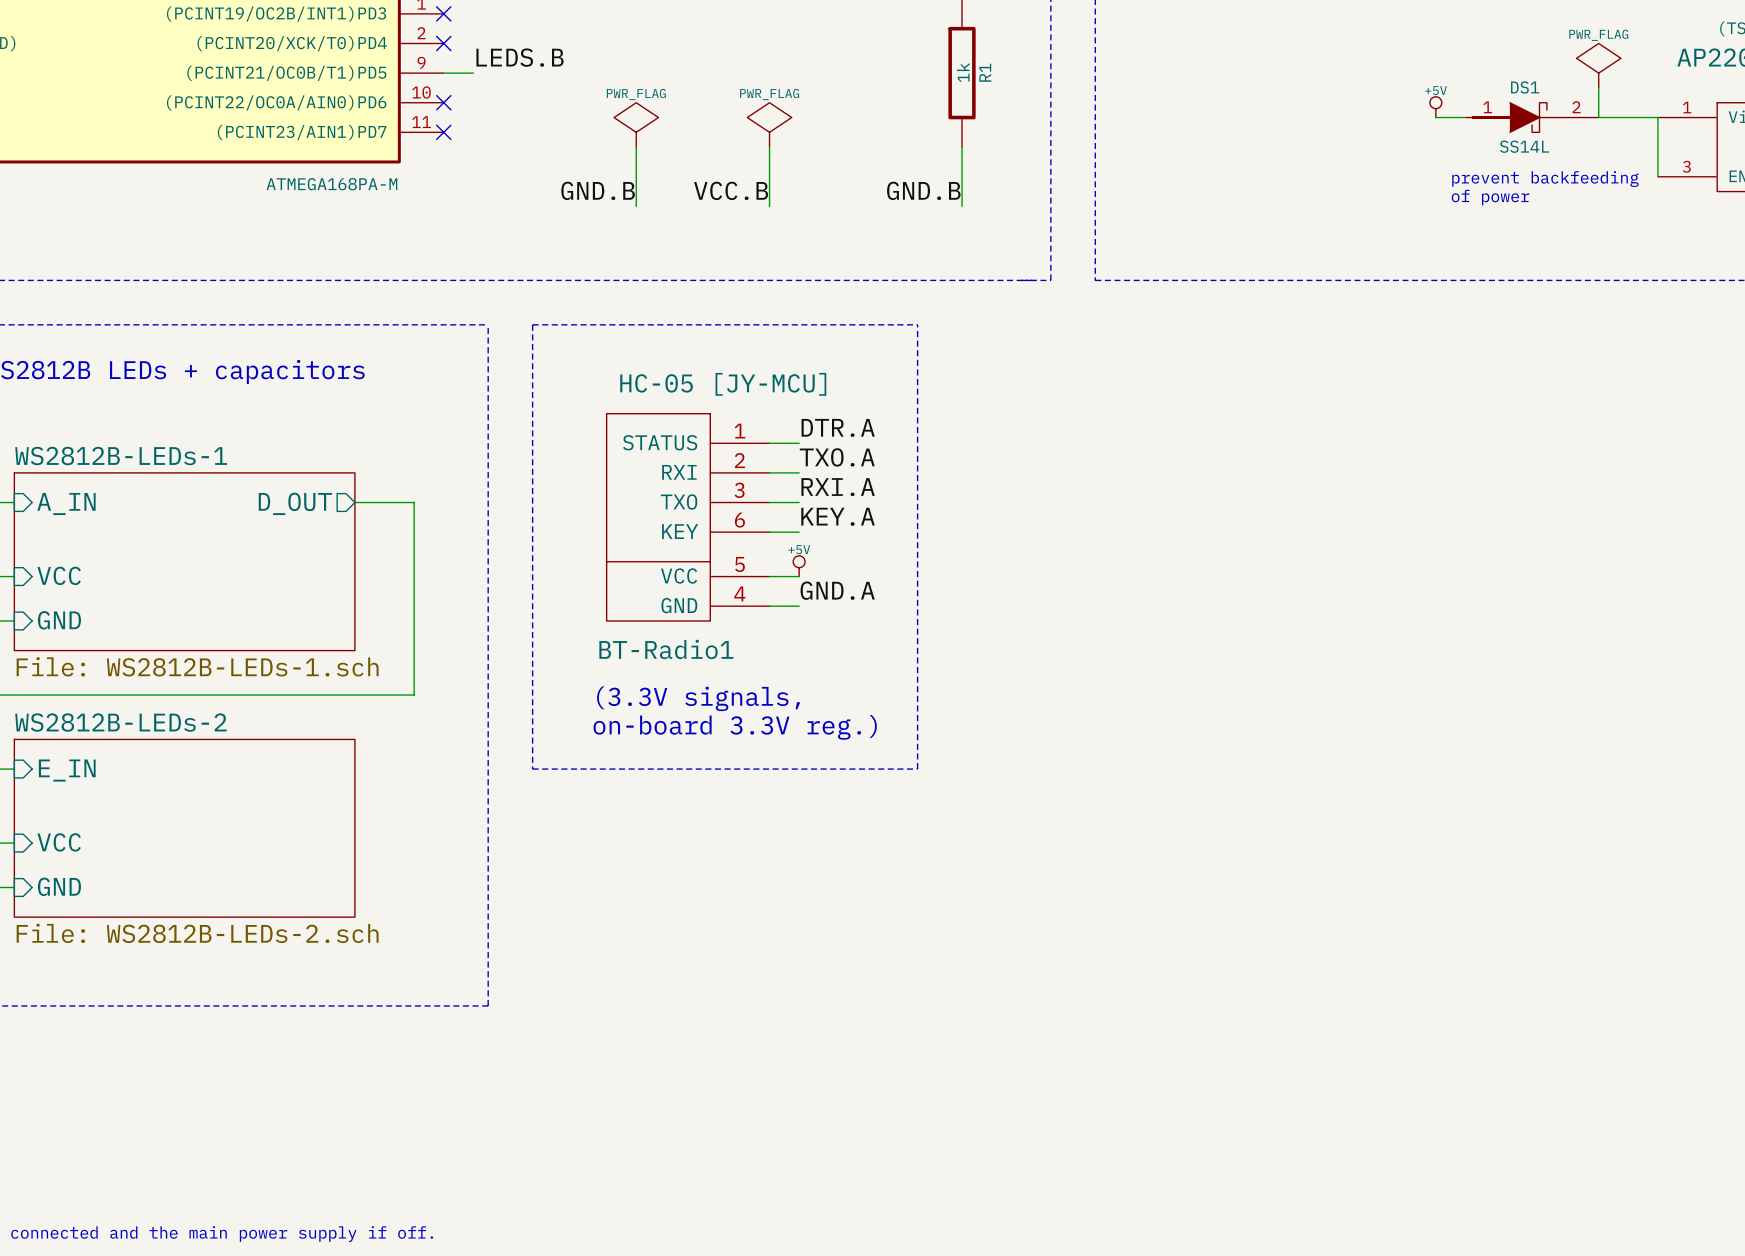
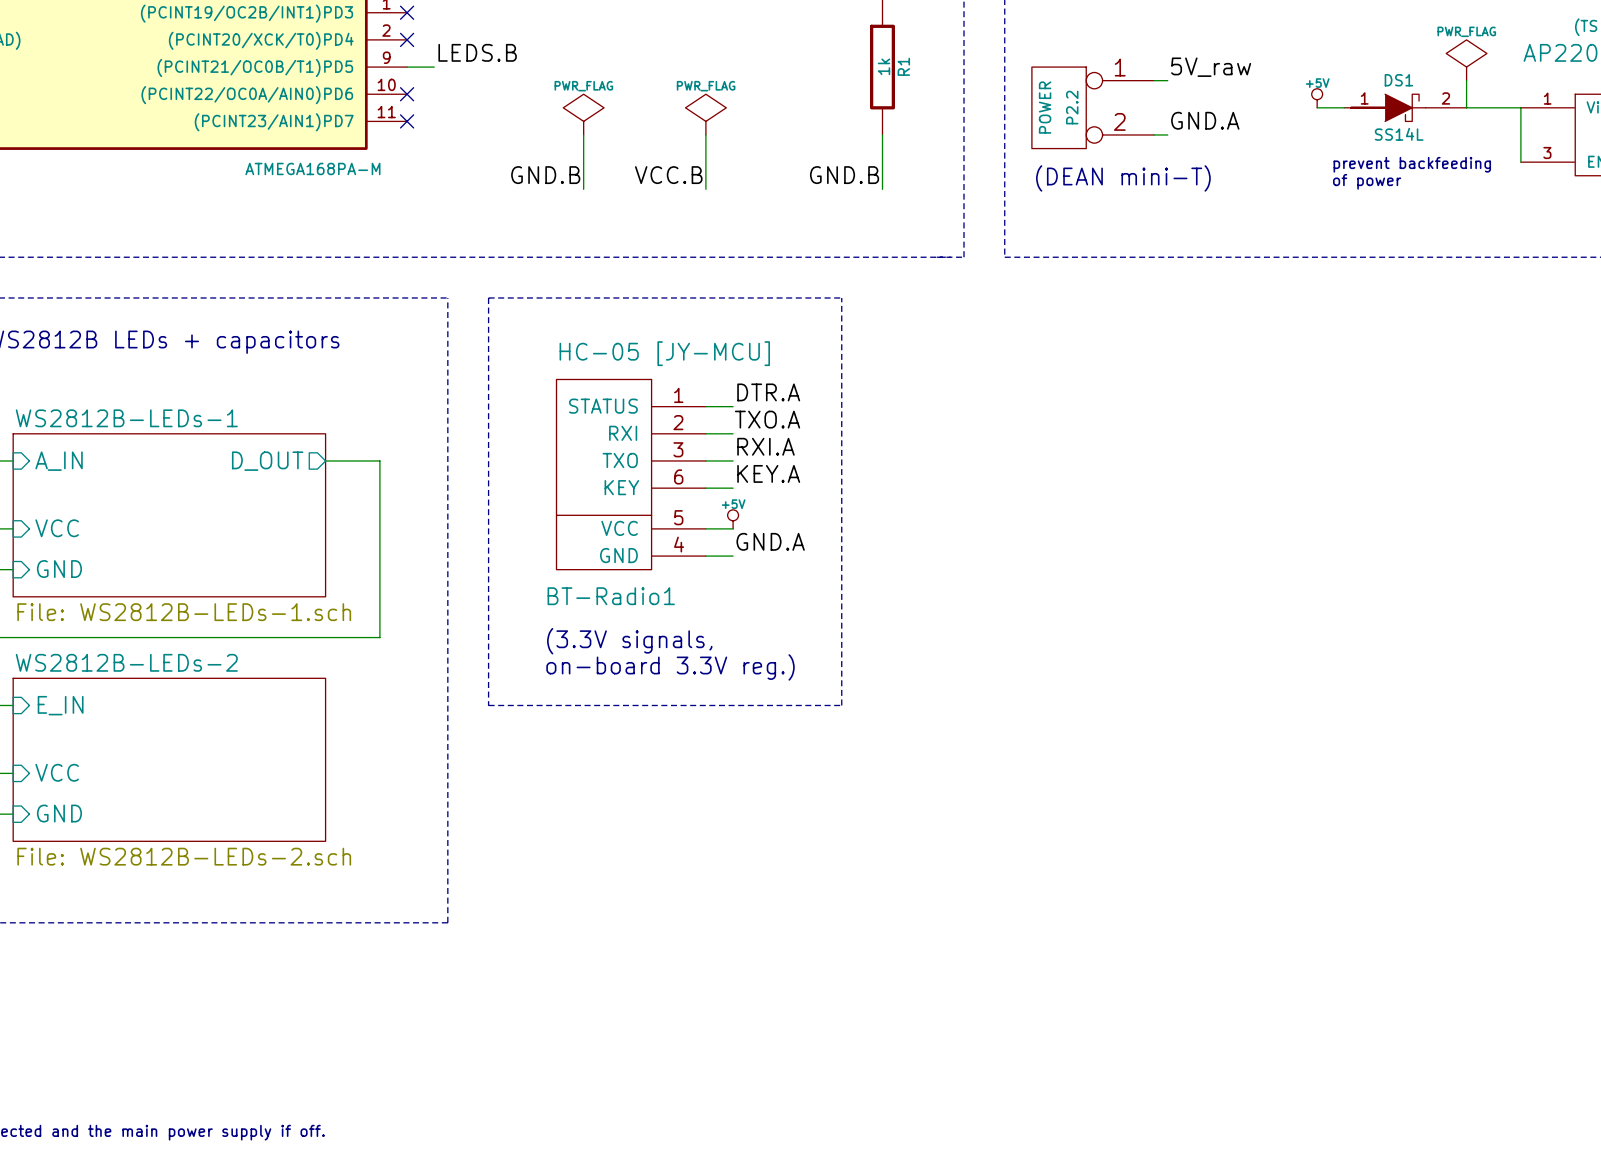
label: none -> 5V_raw (1211, 67)
wire: none -> (1154, 80) (1167, 80)
P2.2: none -> POWER (1093, 107)
label: none -> GND.A (1205, 120)
wire: none -> (1154, 134) (1167, 134)
text: none -> (DEAN mini-T) (1123, 178)

